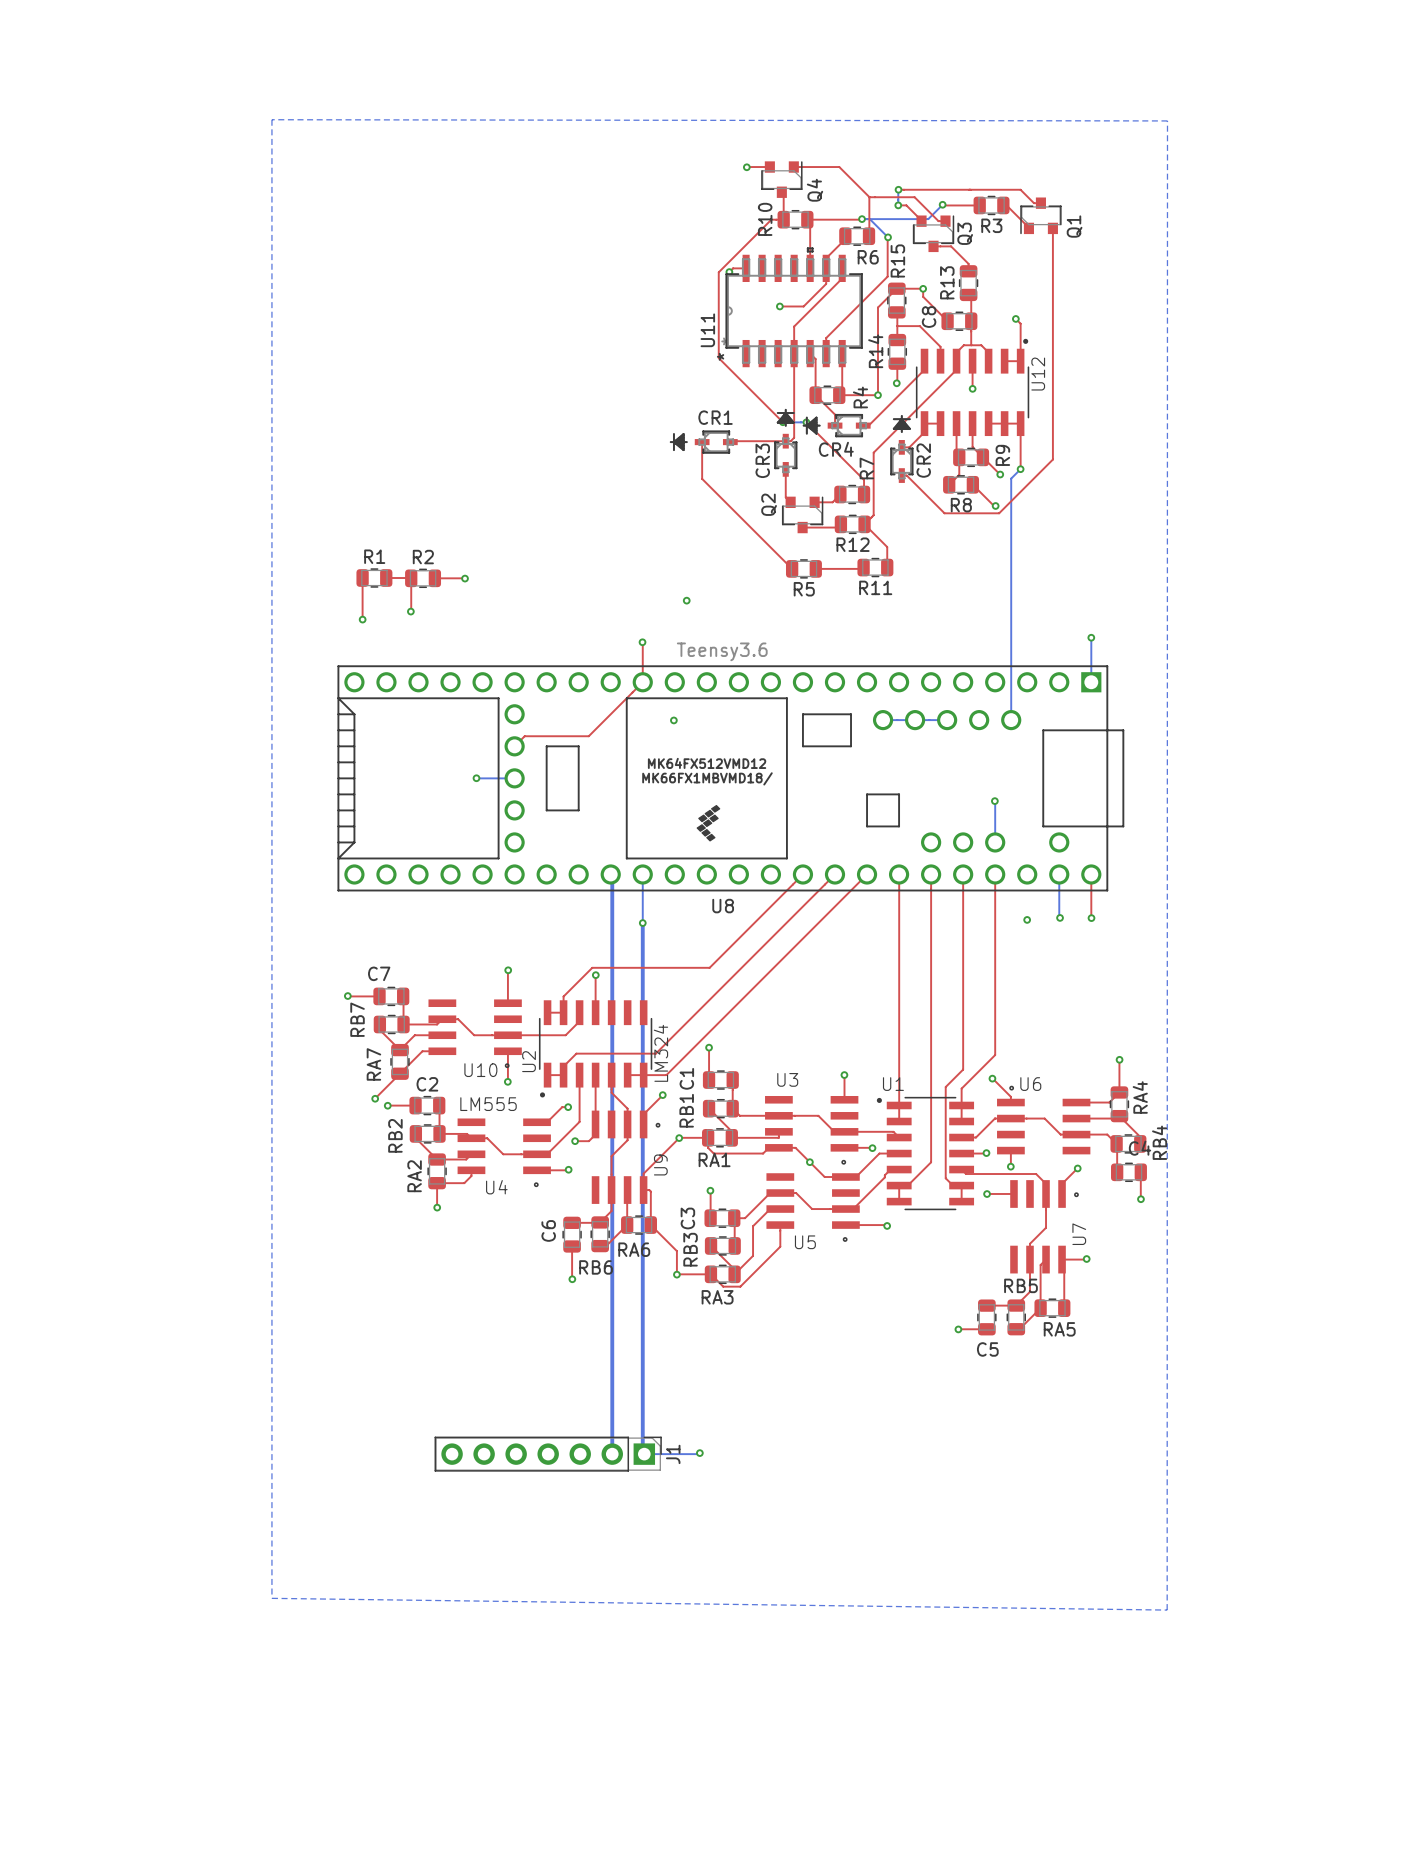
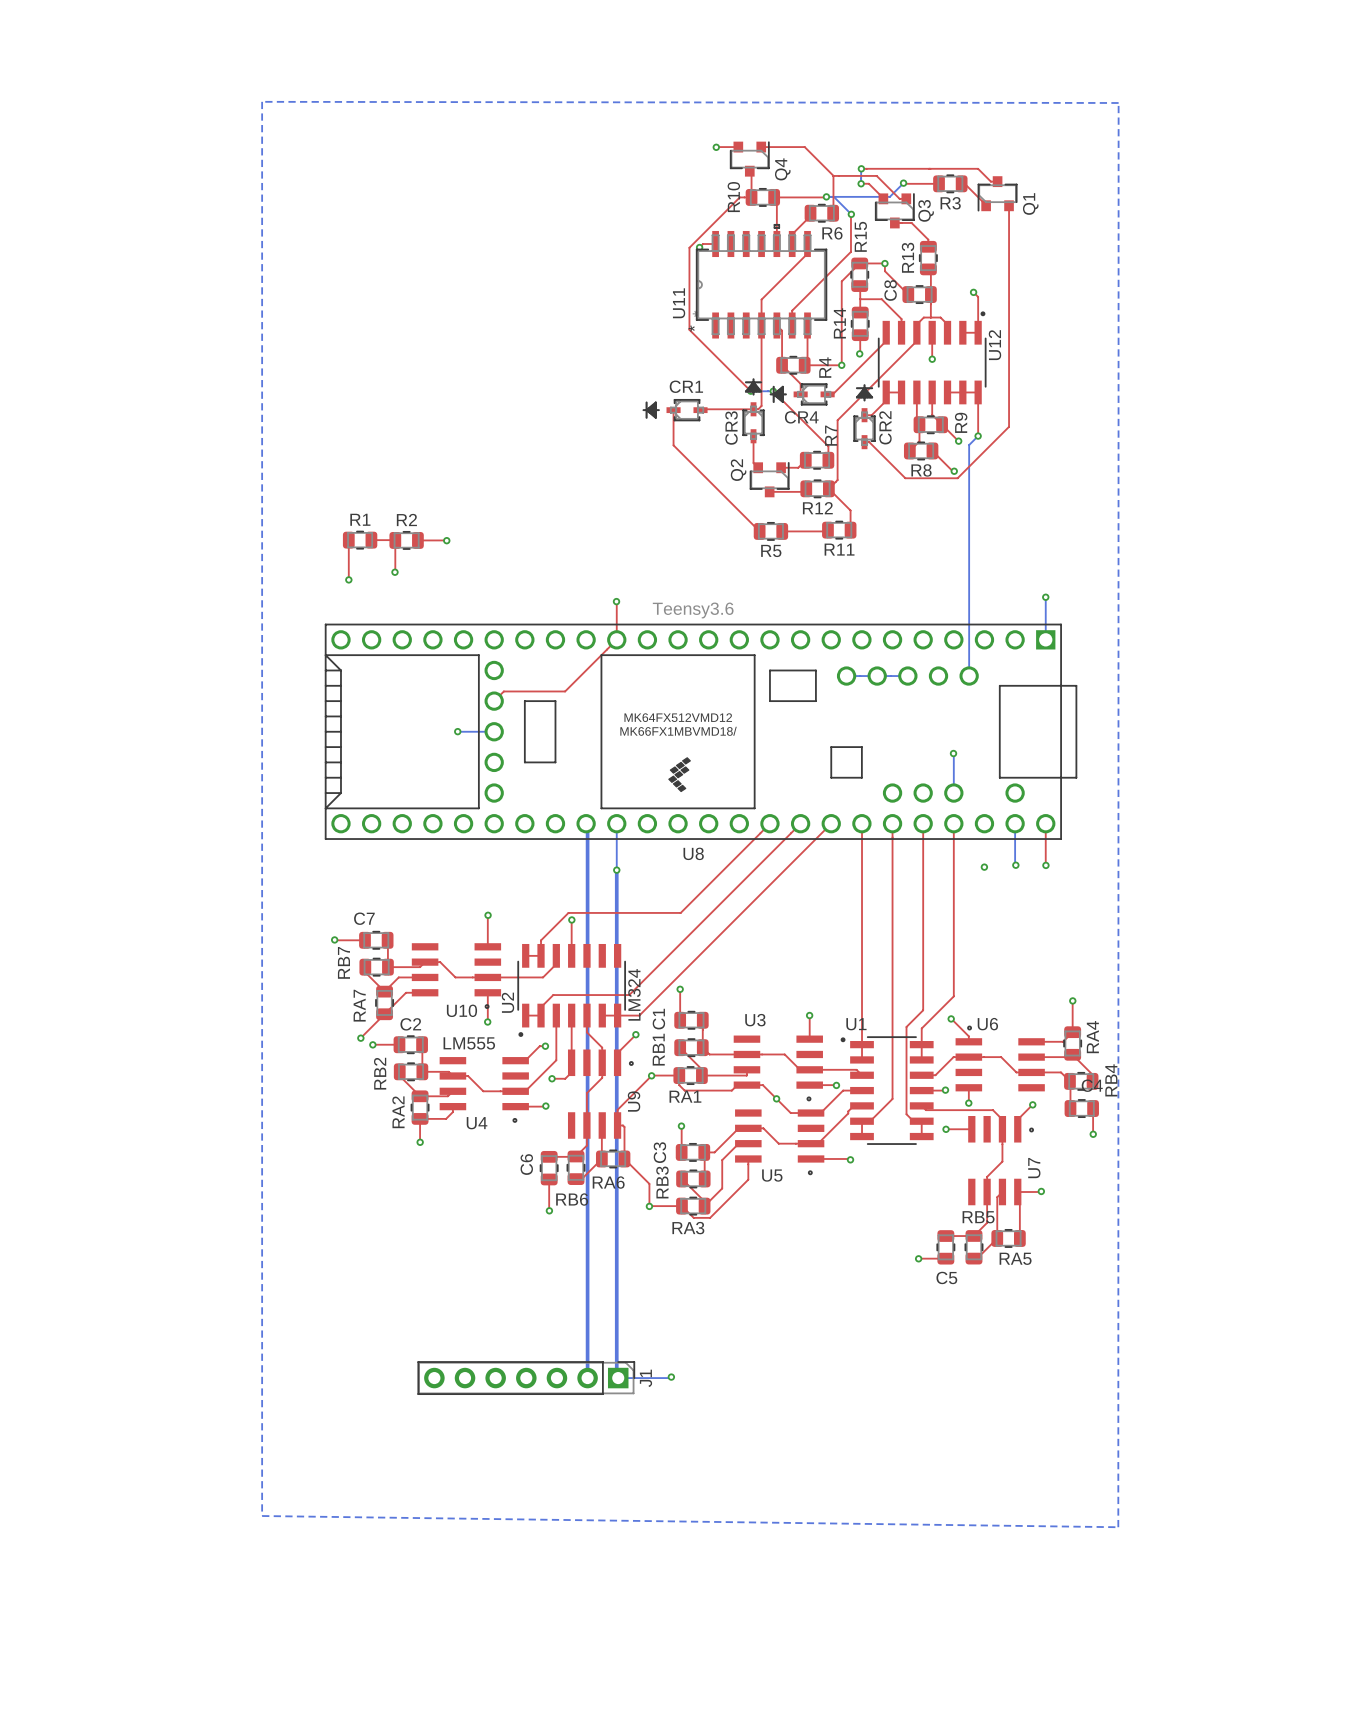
top track: (826, 268) (826, 283) (803, 306) (779, 306) -> none
via: (779, 306) -> none
via: (686, 600) -> none
via: (673, 720) -> none

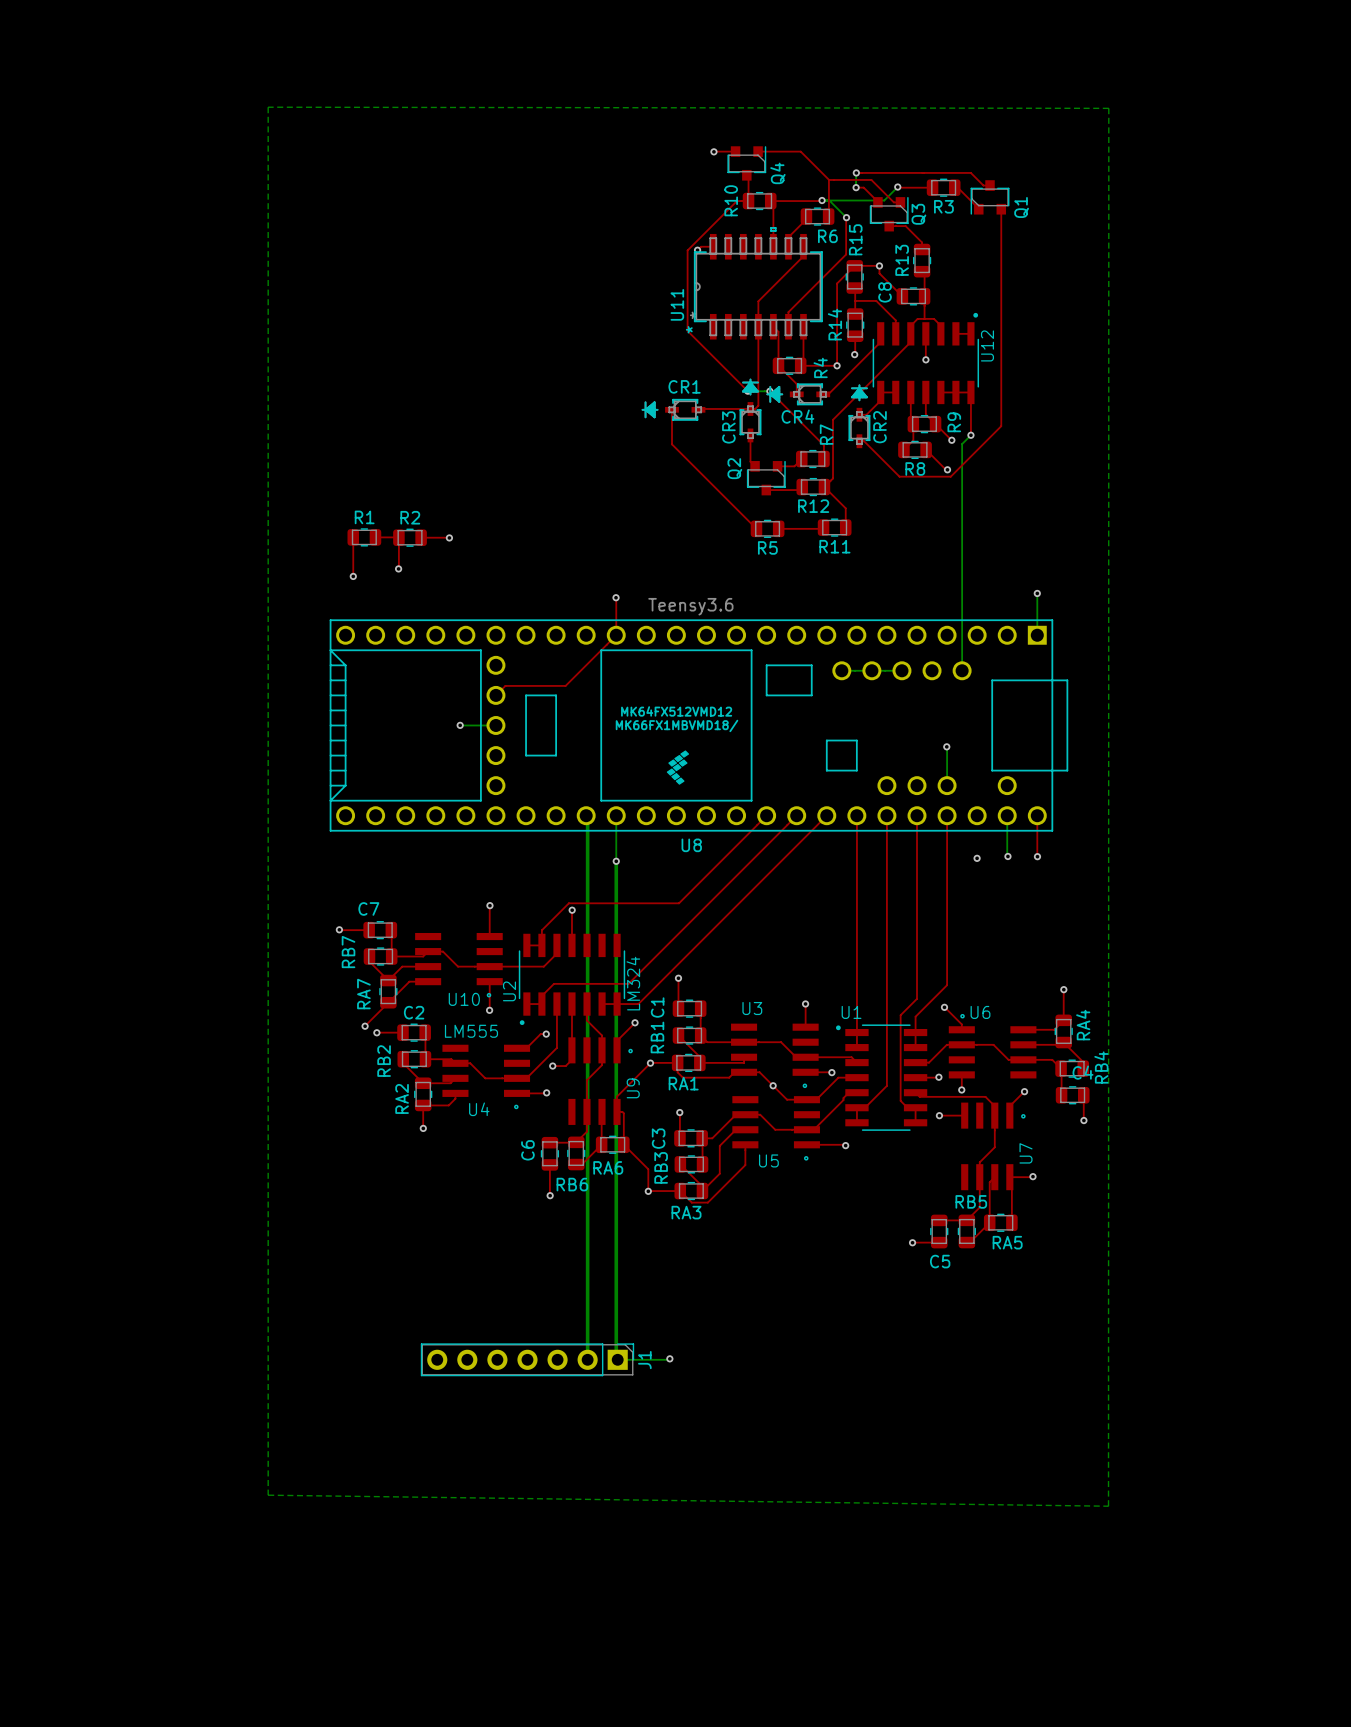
top track: (973, 292) (978, 296) (978, 332) -> none
via: (973, 292) -> none

